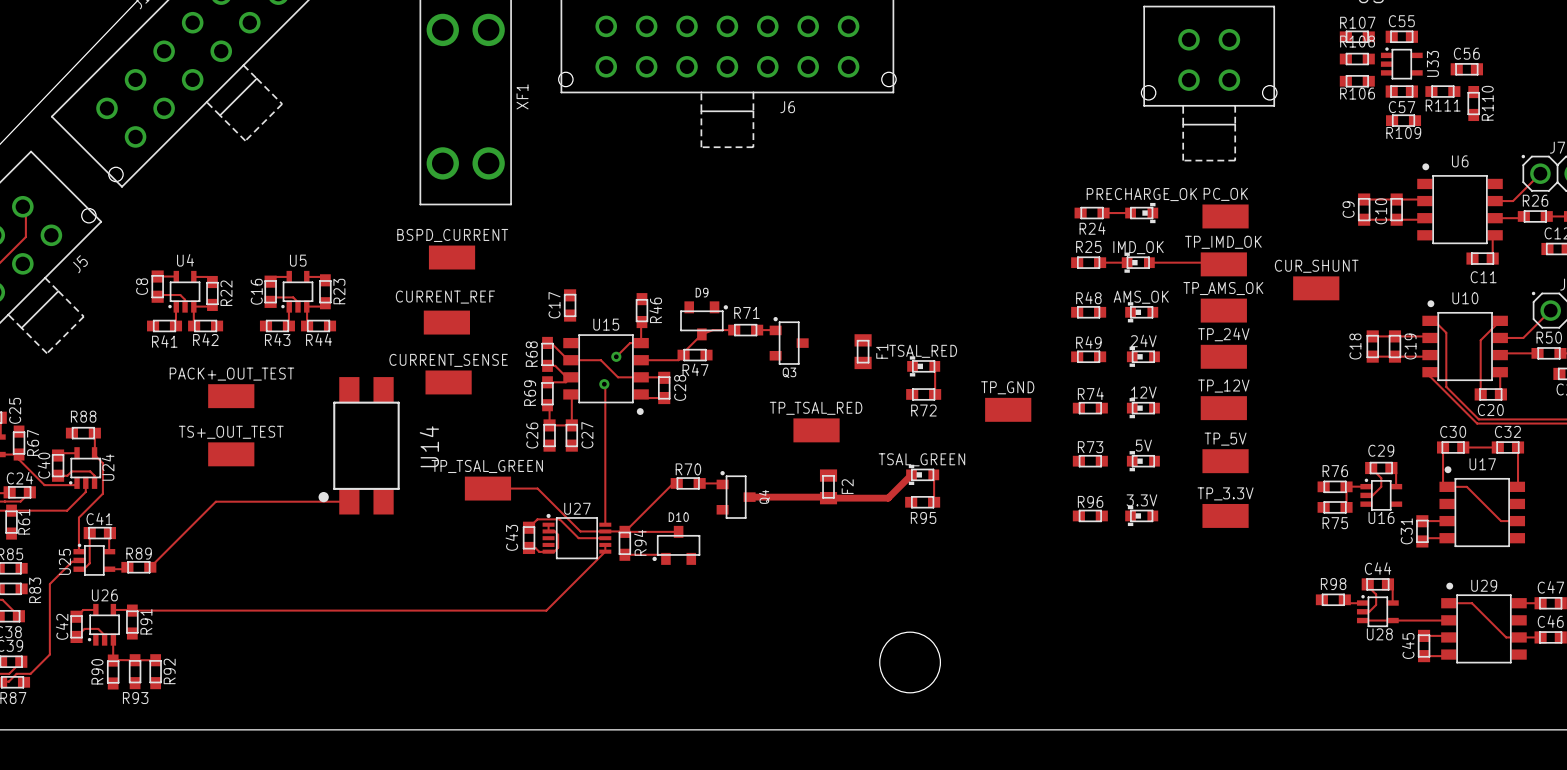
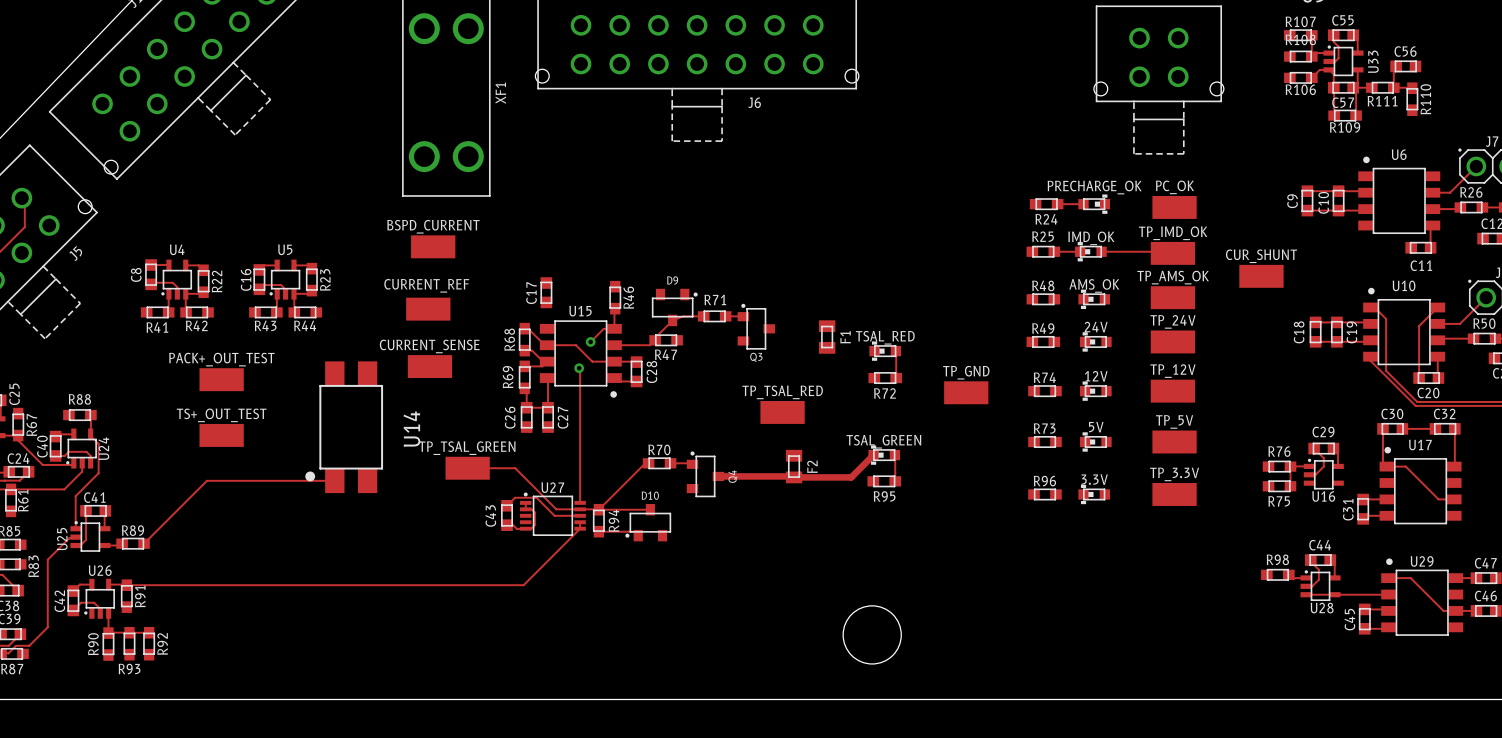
track: none -> (1311, 35) (1311, 56) (1315, 53) (1329, 53)
track: none -> (1333, 35) (1333, 41) (1338, 46) (1338, 58) (1335, 61) (1329, 61)
track: none -> (1353, 35) (1357, 39) (1357, 53)
track: none -> (1396, 66) (1393, 68) (1393, 87) (1412, 88)
track: none -> (1357, 69) (1357, 83) (1353, 87) (1371, 87)
track: none -> (1311, 77) (1319, 69) (1329, 69) (1333, 74) (1334, 115)
track: none -> (1356, 87) (1356, 115)

